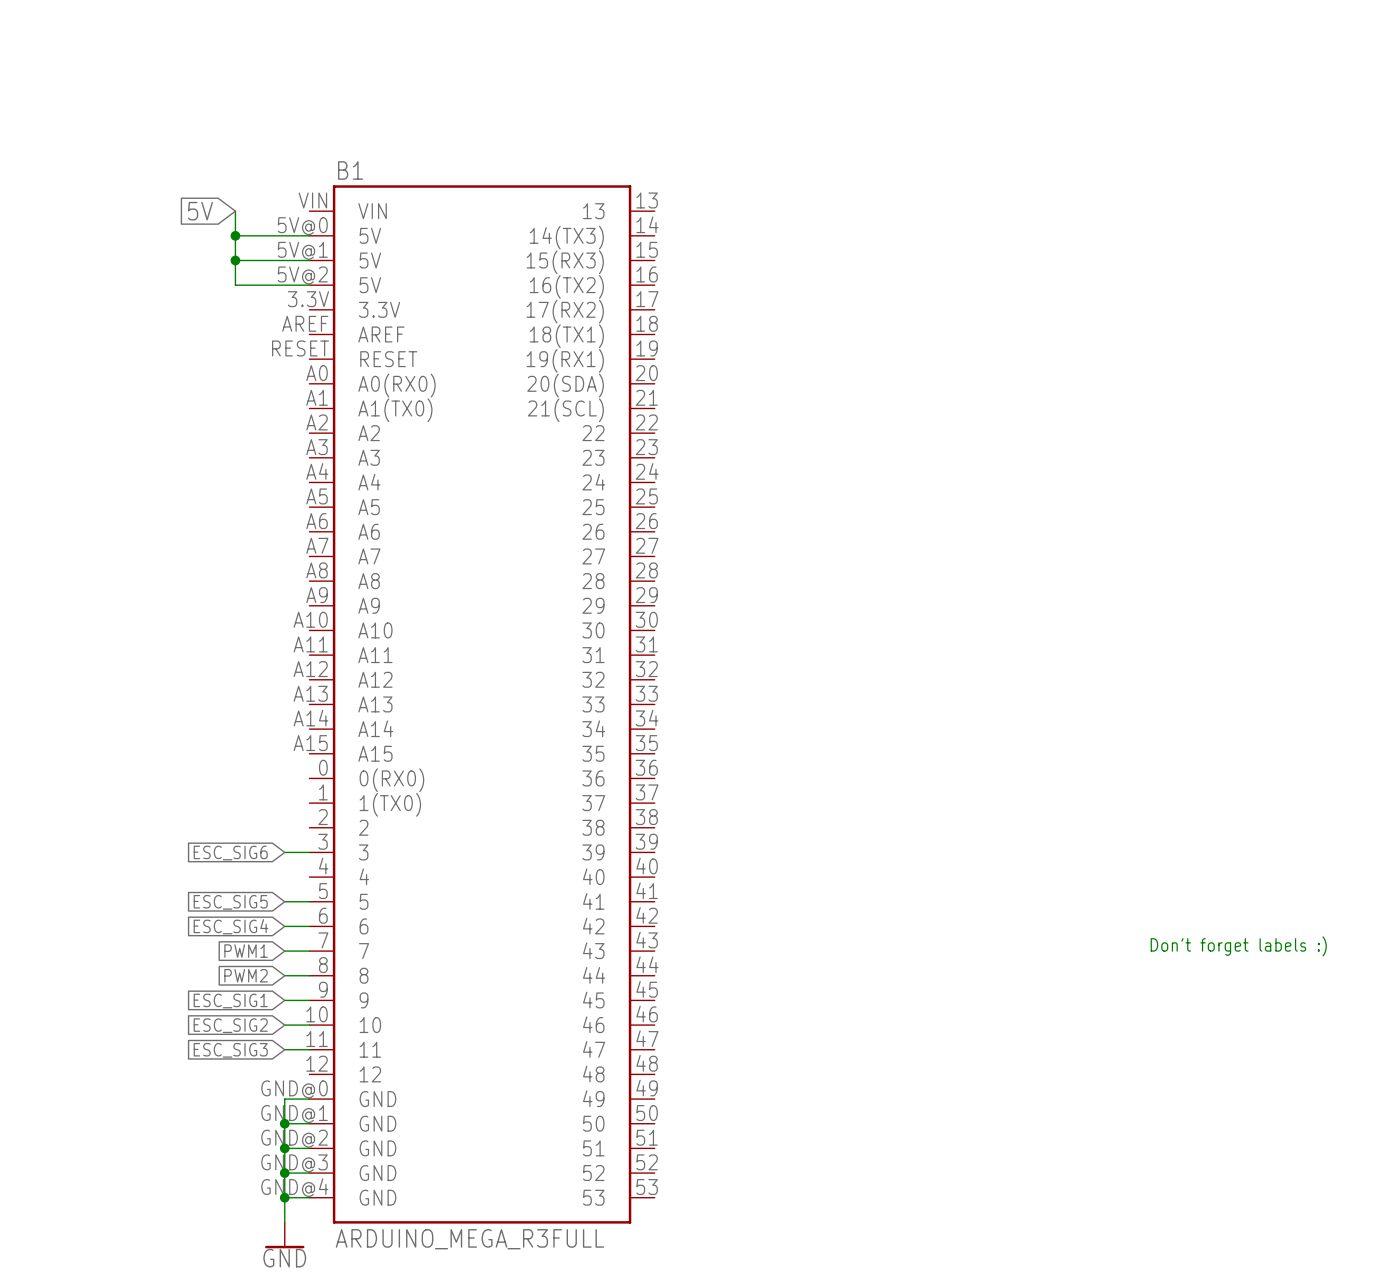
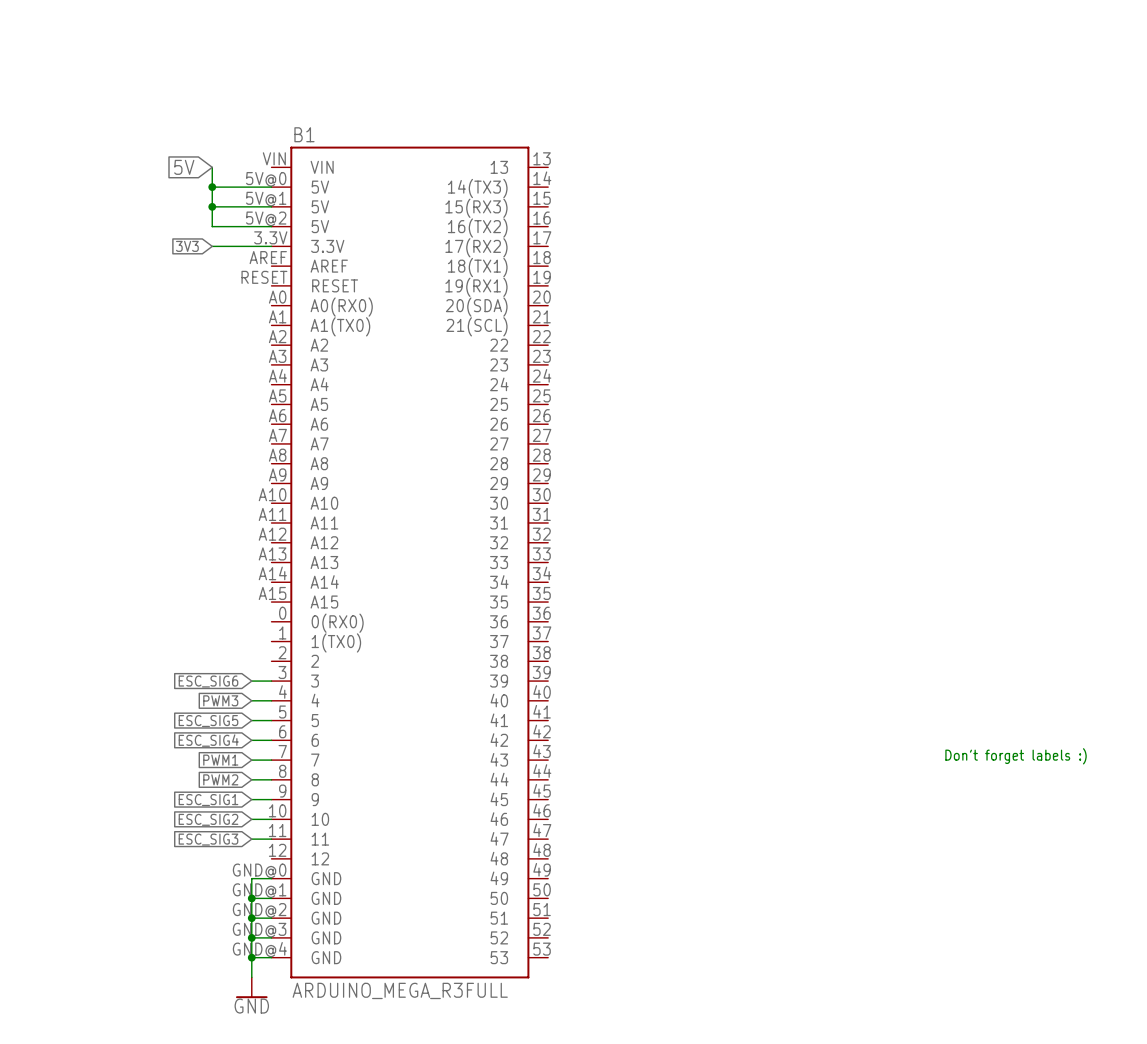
global label: none -> 3V3 (187, 246)
wire: none -> (212, 246) (271, 246)
global label: none -> PWM3 (220, 700)
wire: none -> (251, 700) (271, 700)

